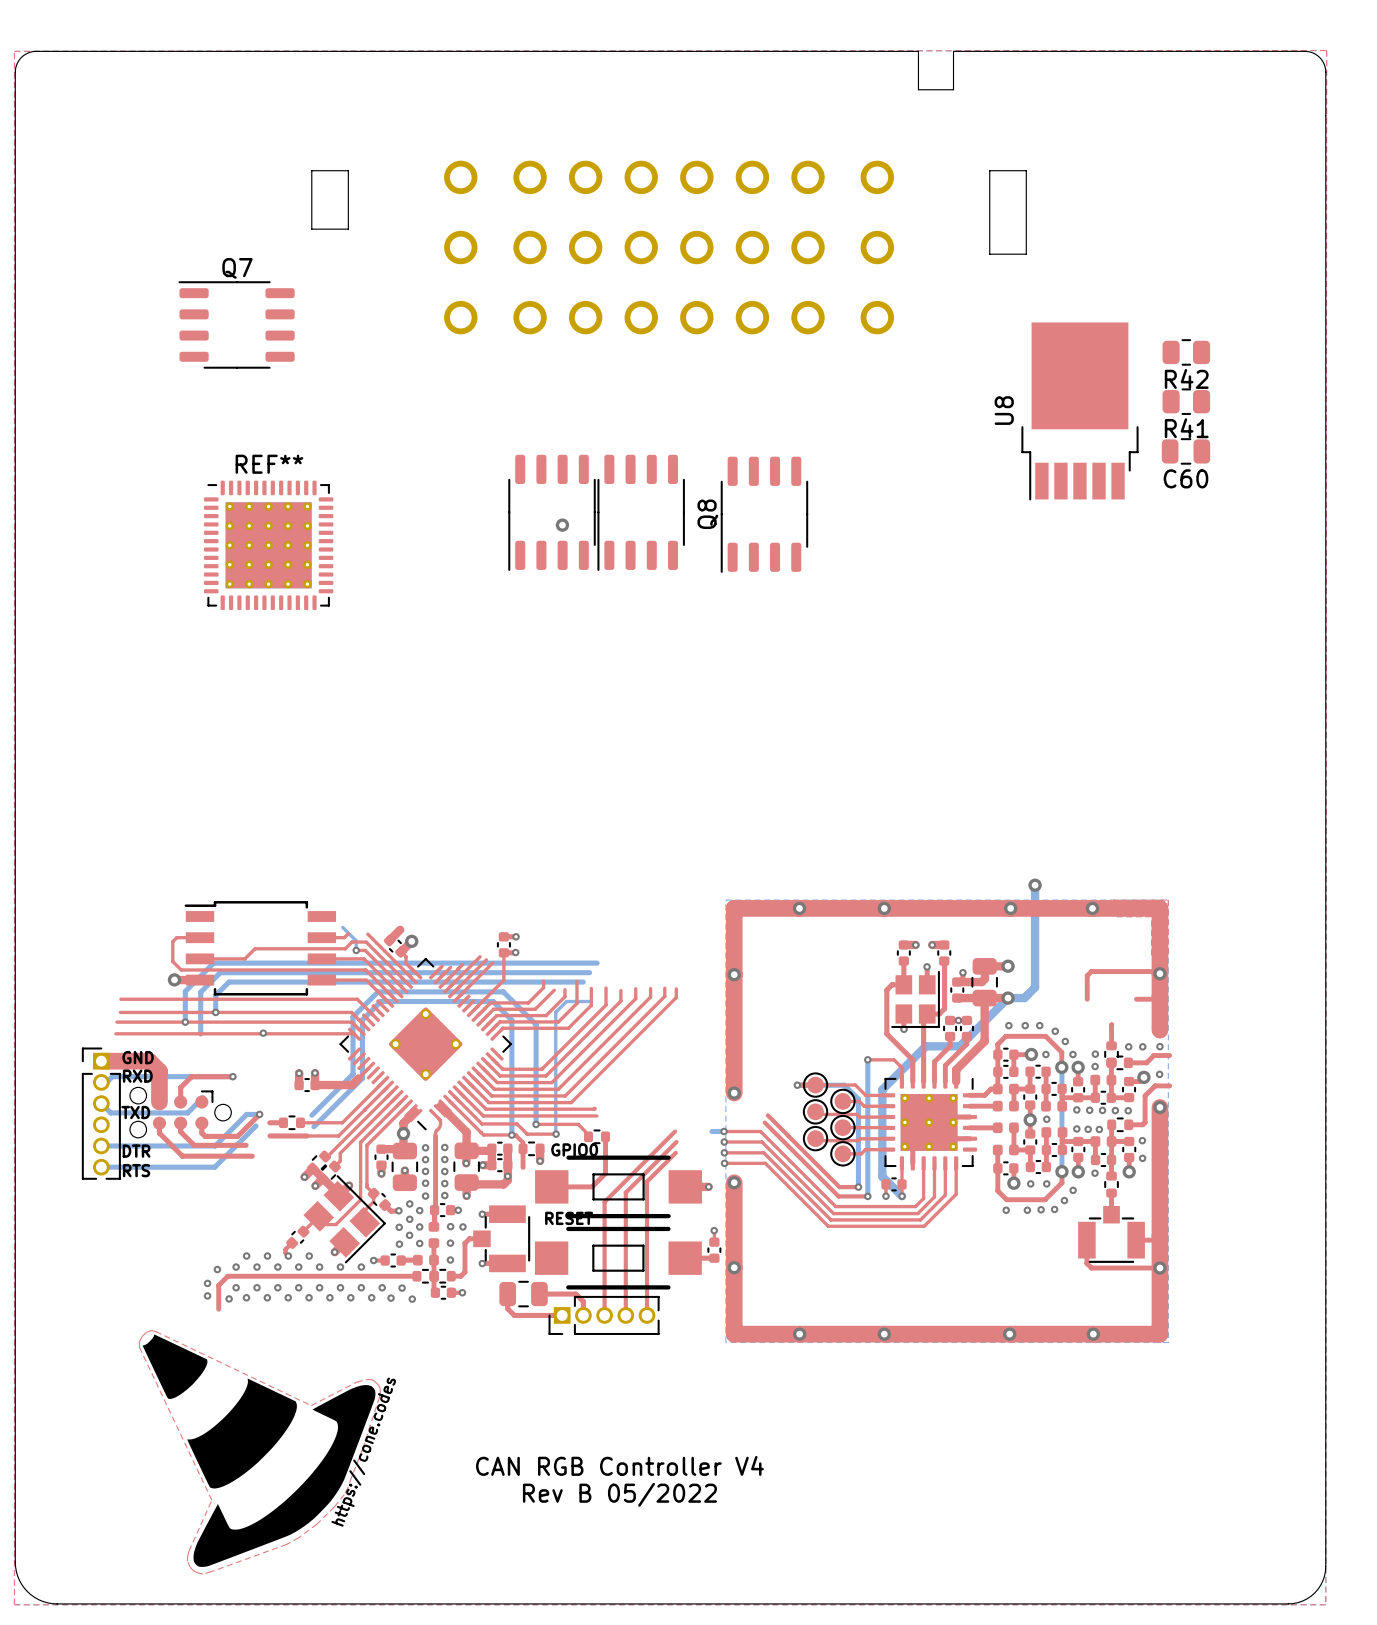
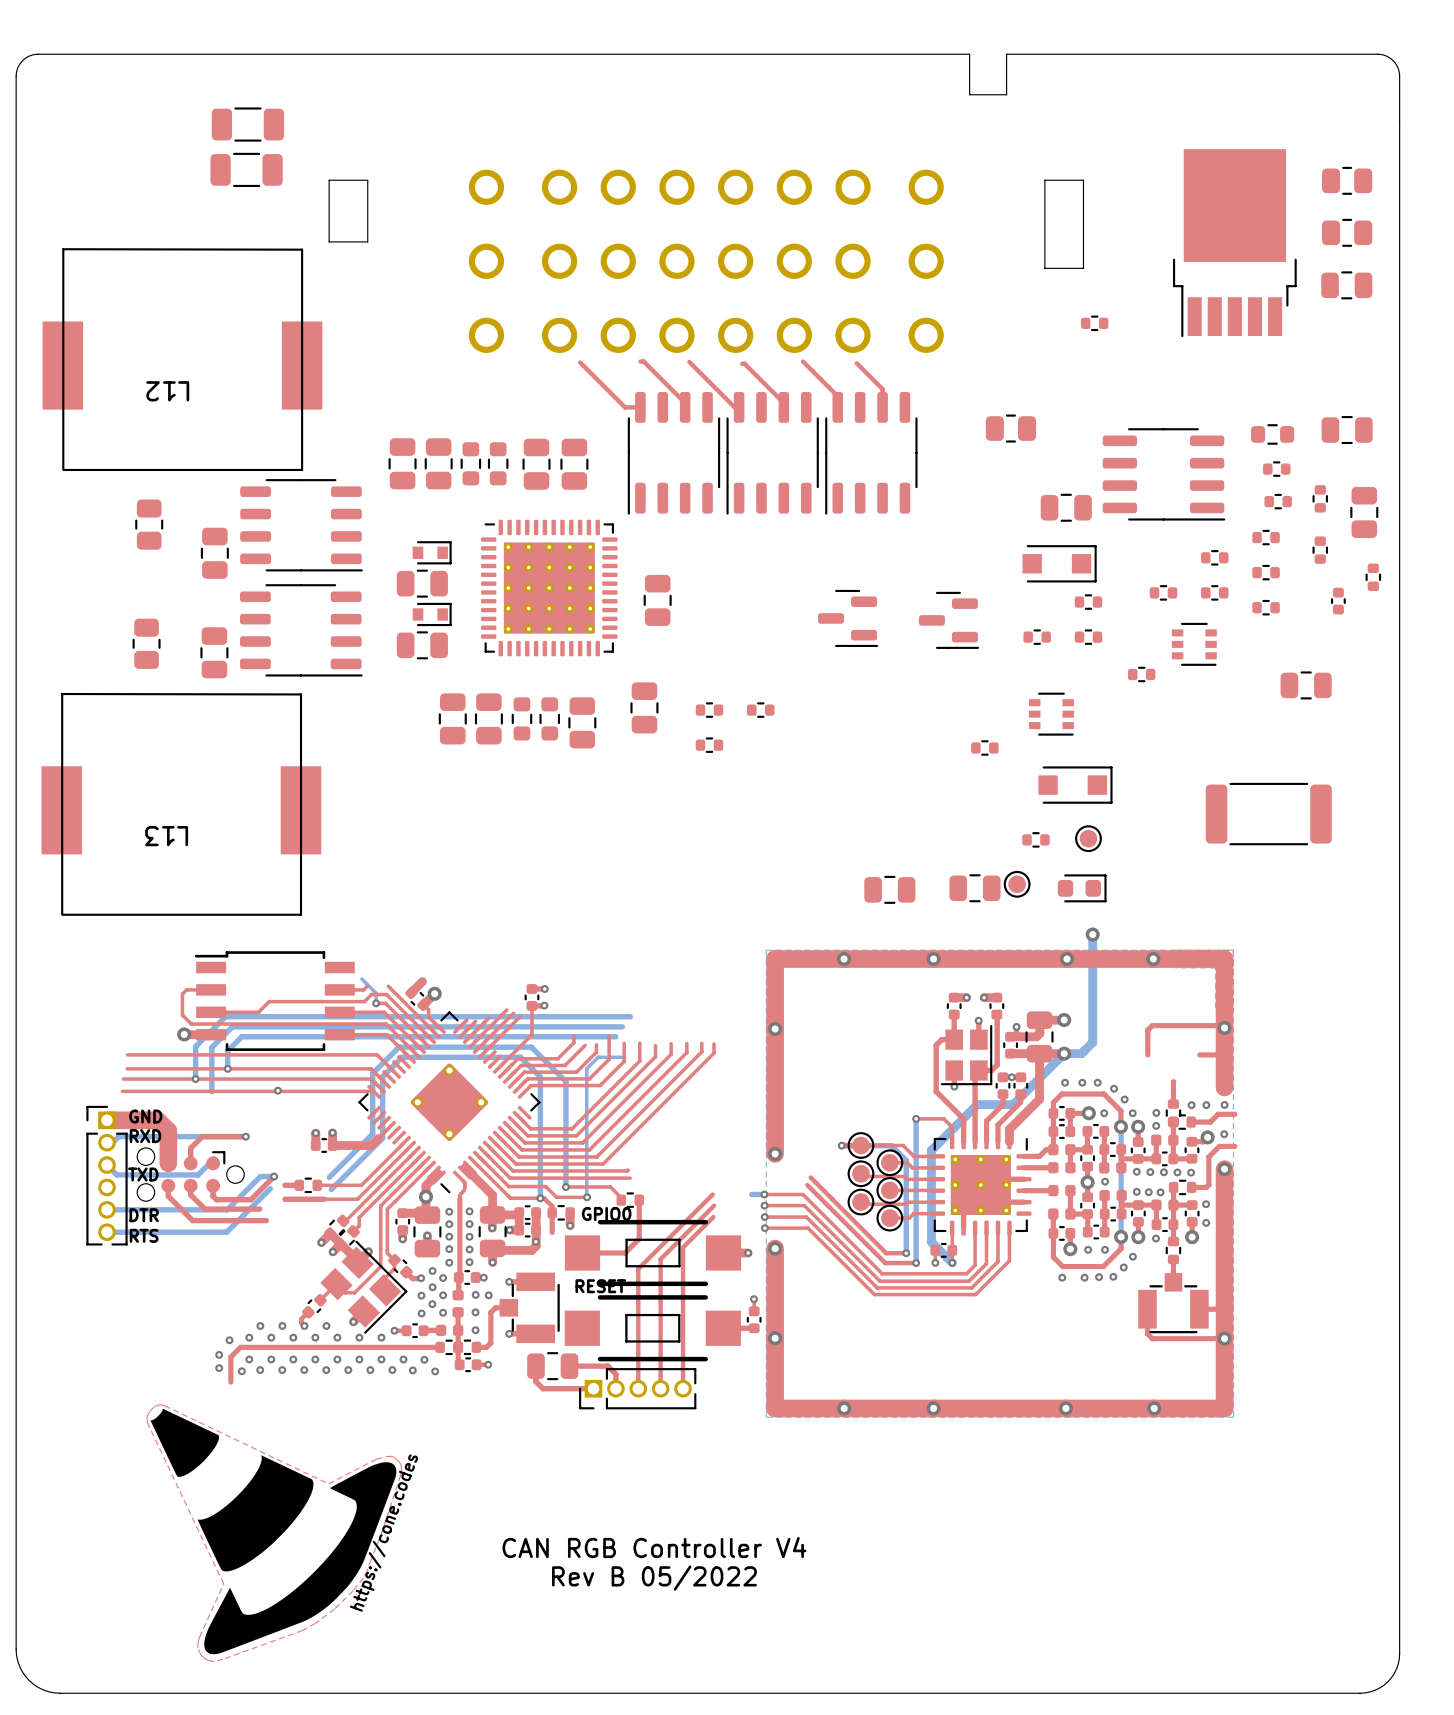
top zone outline: (1326, 50) (14, 51) (14, 1604) (1325, 1604) (1326, 50) -> none
part: none -> (247, 124)
part: none -> (246, 169)
part: none -> (1347, 180)
part: none -> (1347, 232)
part: none -> (1234, 243)
part: none -> (1346, 285)
part: none -> (1094, 323)
Q7: (236, 324) -> none
L12: none -> (182, 359)
top track: none -> (640, 361) (643, 361) (685, 403) (685, 407)
top track: none -> (689, 362) (734, 407) (739, 407)
top track: none -> (803, 361) (837, 396) (837, 407)
top track: none -> (580, 362) (625, 407) (640, 407)
top track: none -> (742, 363) (744, 363) (783, 403) (783, 407)
top track: none -> (856, 363) (882, 389) (882, 407)
R42: (1186, 352) -> none
R41: (1186, 401) -> none
part: none -> (1010, 428)
part: none -> (1347, 430)
U8: (1079, 411) -> none
part: none -> (1272, 434)
part: none -> (673, 453)
part: none -> (772, 453)
part: none -> (871, 453)
part: none -> (402, 463)
part: none -> (438, 463)
part: none -> (470, 463)
part: none -> (498, 463)
part: none -> (536, 464)
part: none -> (574, 464)
part: none -> (1276, 469)
part: none -> (1164, 474)
C60: (1185, 451) -> none
part: none -> (1320, 498)
part: none -> (1278, 501)
part: none -> (1066, 507)
part: none -> (1364, 512)
part: none -> (149, 524)
part: none -> (301, 525)
part: none -> (1266, 537)
part: (552, 512) -> none
part: (641, 512) -> none
Q8: (764, 514) -> none
part: none -> (1320, 550)
part: none -> (432, 552)
part: none -> (214, 553)
via: (562, 525) -> none
part: none -> (1214, 557)
part: none -> (1059, 563)
part: none -> (1266, 572)
REF**: (268, 545) -> none
part: none -> (1373, 577)
part: none -> (422, 583)
part: none -> (549, 588)
part: none -> (1163, 592)
part: none -> (1214, 592)
part: none -> (657, 600)
part: none -> (1338, 601)
part: none -> (1088, 602)
part: none -> (1266, 607)
part: none -> (432, 614)
part: none -> (848, 618)
part: none -> (948, 620)
part: none -> (301, 630)
part: none -> (1037, 637)
part: none -> (1088, 637)
part: none -> (146, 643)
part: none -> (1194, 644)
part: none -> (422, 645)
part: none -> (214, 652)
part: none -> (1141, 674)
part: none -> (1306, 685)
part: none -> (644, 707)
part: none -> (709, 710)
part: none -> (760, 710)
part: none -> (1051, 714)
part: none -> (452, 718)
part: none -> (488, 718)
part: none -> (521, 718)
part: none -> (549, 718)
part: none -> (582, 722)
part: none -> (709, 745)
part: none -> (984, 747)
part: none -> (1075, 785)
L13: none -> (181, 804)
part: none -> (1268, 814)
part: none -> (1088, 838)
part: none -> (1035, 839)
part: none -> (1017, 884)
part: none -> (974, 888)
part: none -> (1082, 888)
part: none -> (889, 889)

